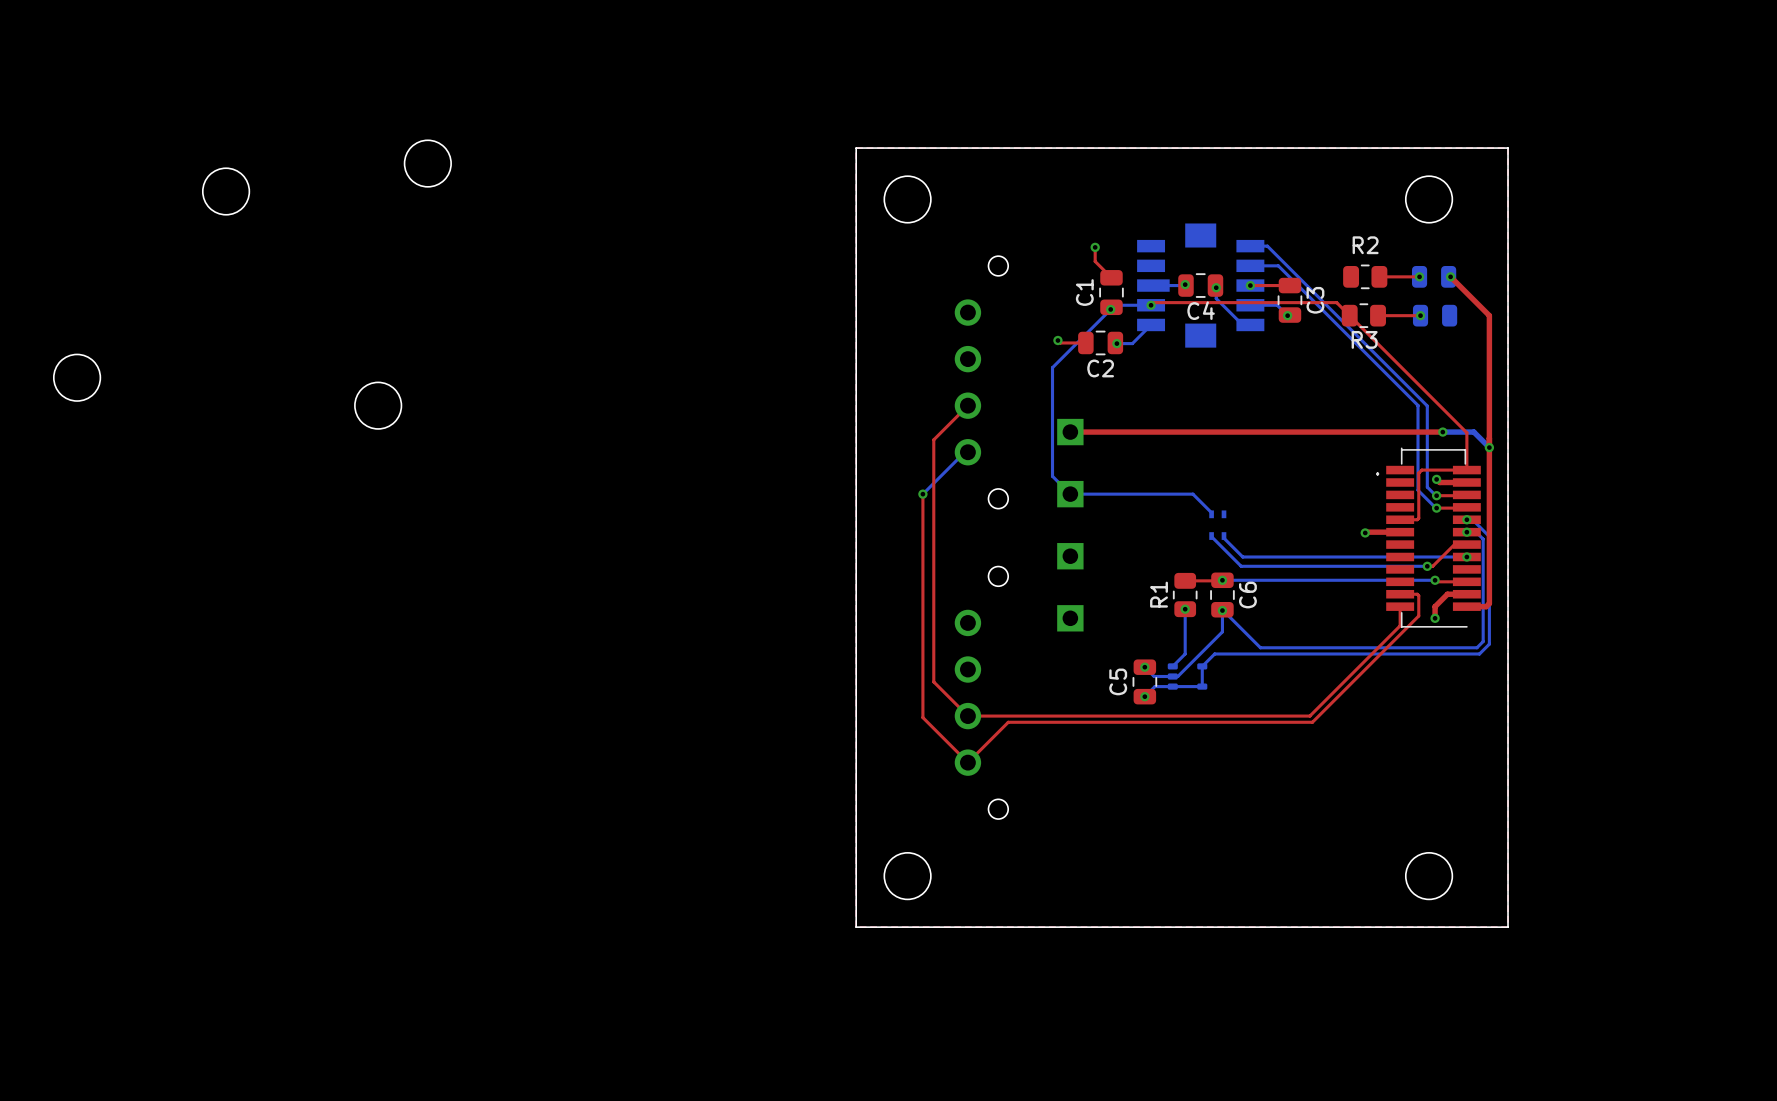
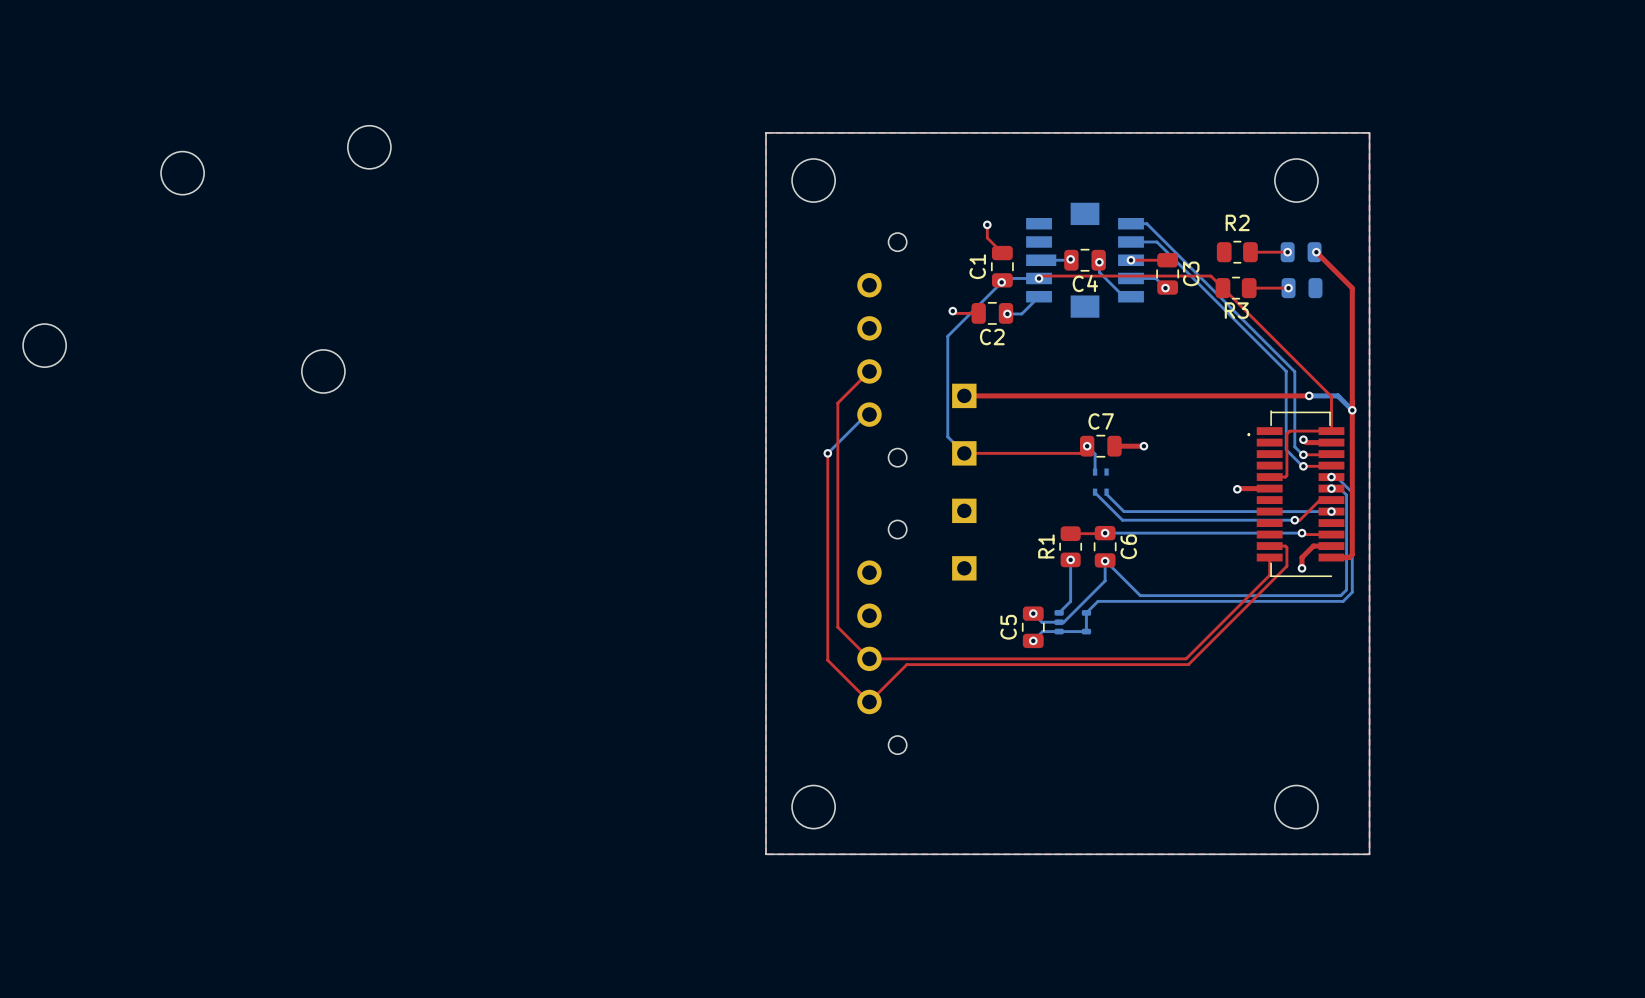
top track: none -> (1087, 446) (1079, 453) (964, 453)
via: none -> (1087, 446)
C7: none -> (1100, 446)
top track: none -> (1114, 446) (1143, 446)
via: none -> (1143, 446)
bottom track: (1070, 494) (1192, 494) (1211, 512) -> (1087, 446) (1095, 454) (1095, 470)

